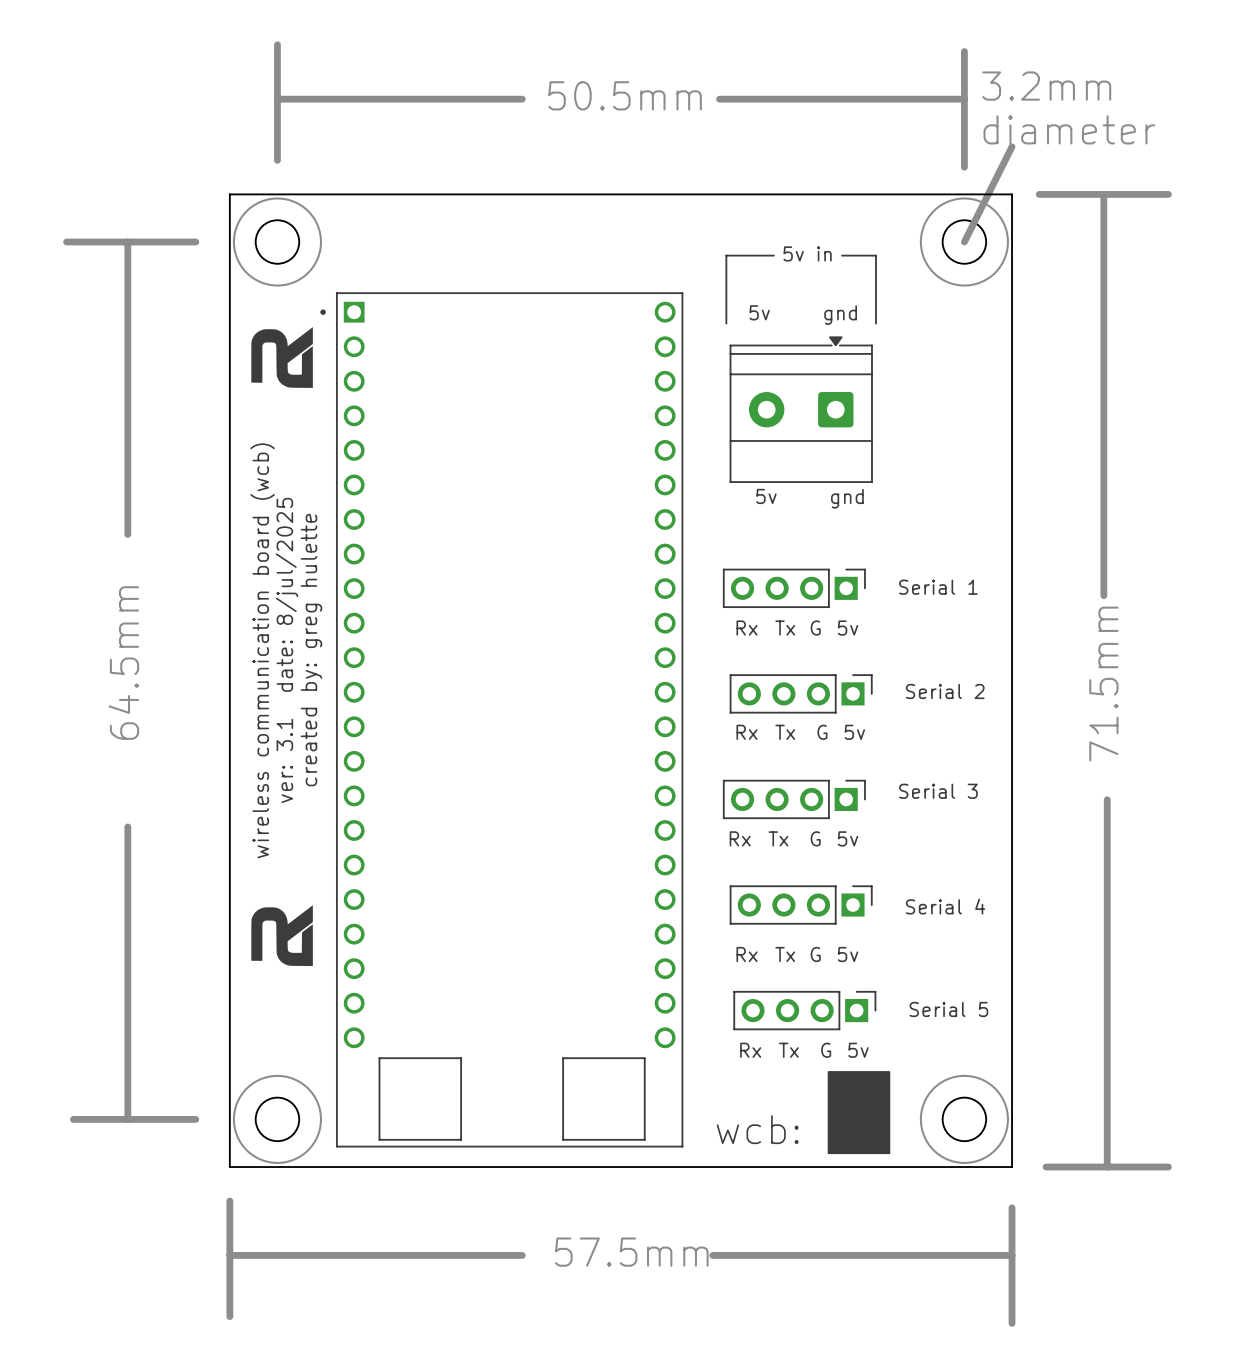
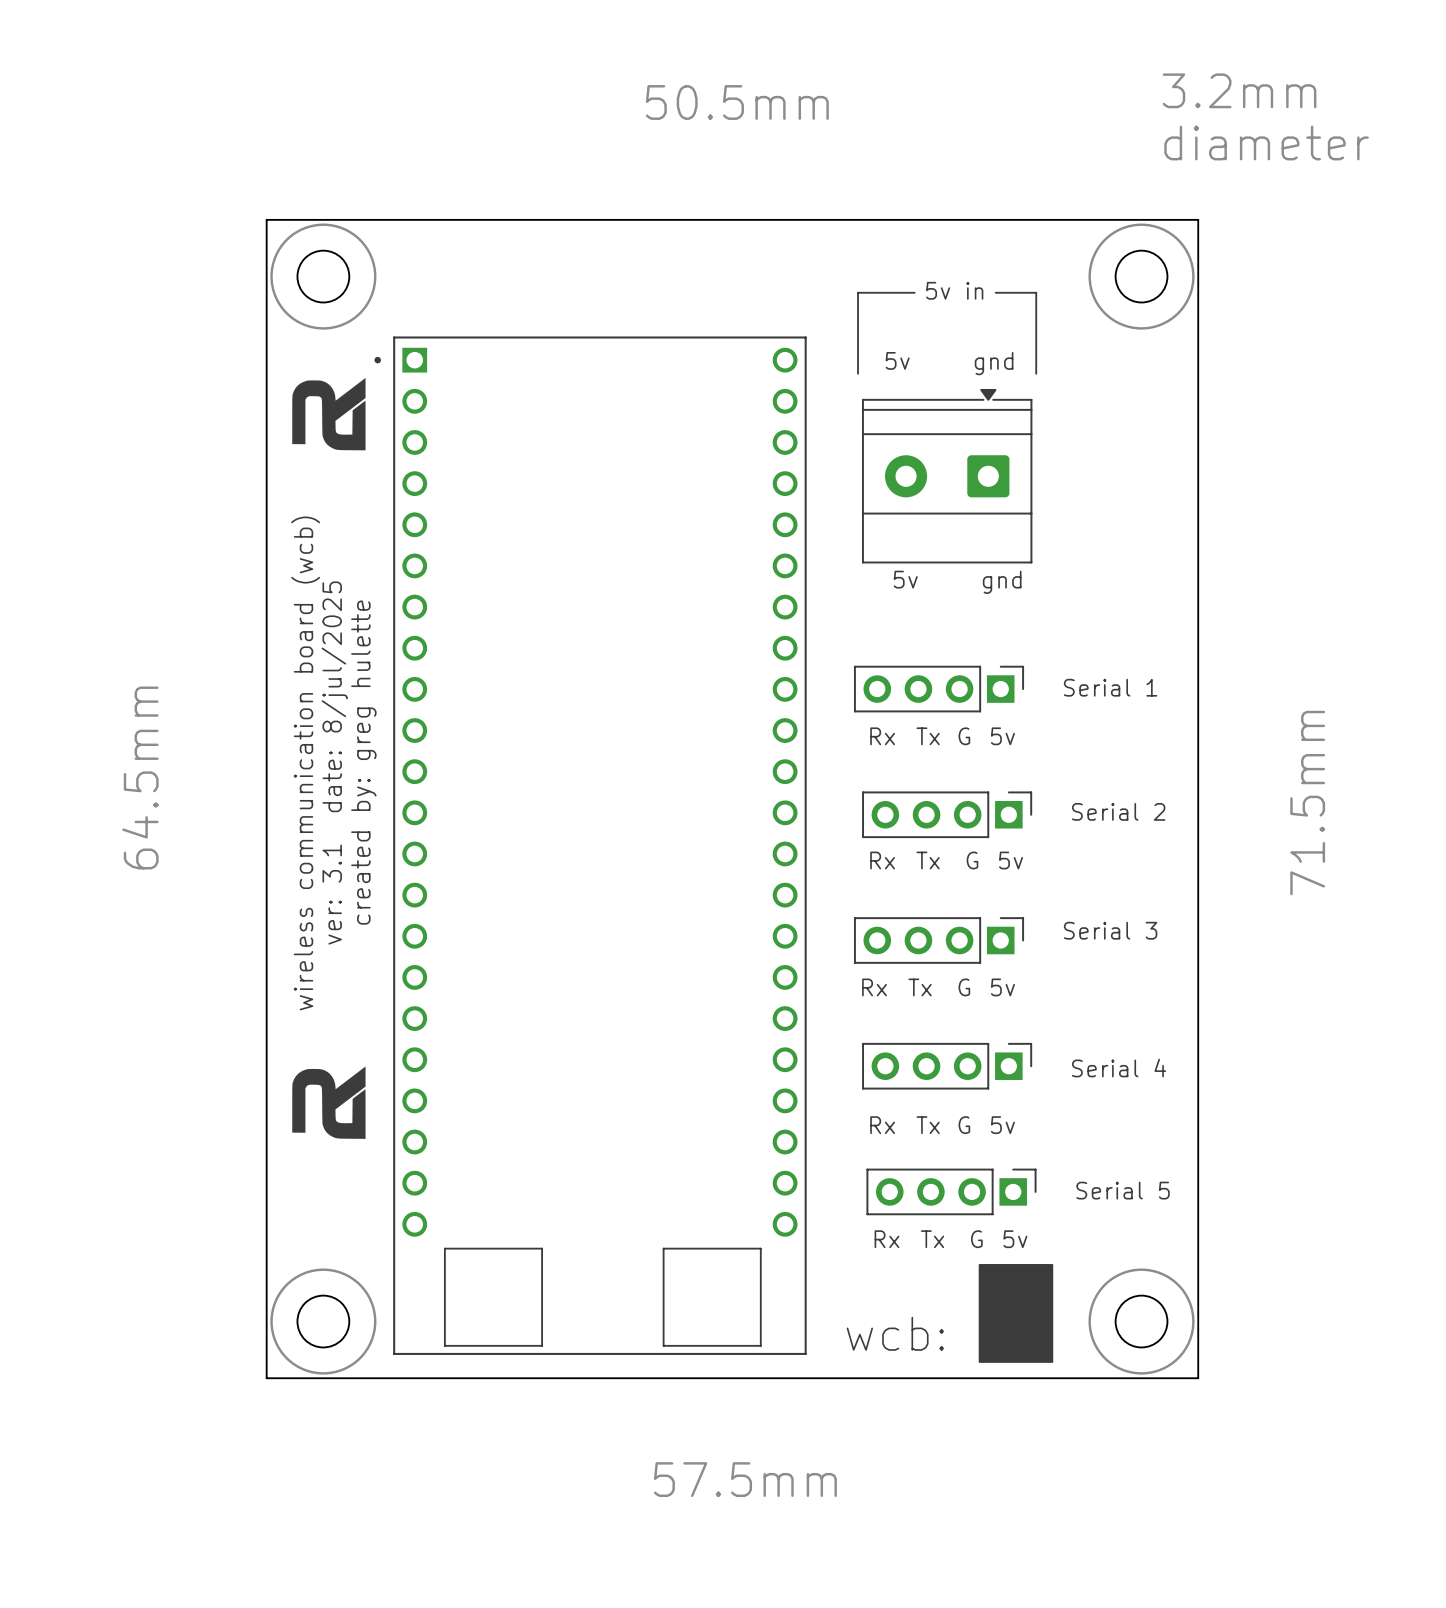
line: (277, 44) (277, 160) -> none
line: (964, 51) (964, 167) -> none
line: (277, 99) (522, 99) -> none
line: (719, 99) (964, 99) -> none
line: (1012, 146) (964, 242) -> none
line: (1039, 194) (1168, 194) -> none
line: (1103, 194) (1103, 595) -> none
line: (66, 242) (195, 242) -> none
line: (127, 242) (127, 534) -> none
line: (1107, 799) (1107, 1167) -> none
line: (127, 826) (127, 1119) -> none
line: (73, 1119) (195, 1119) -> none
line: (1046, 1167) (1168, 1167) -> none
line: (229, 1201) (229, 1316) -> none
line: (1012, 1207) (1012, 1323) -> none
line: (229, 1255) (522, 1255) -> none
line: (712, 1255) (1012, 1255) -> none

